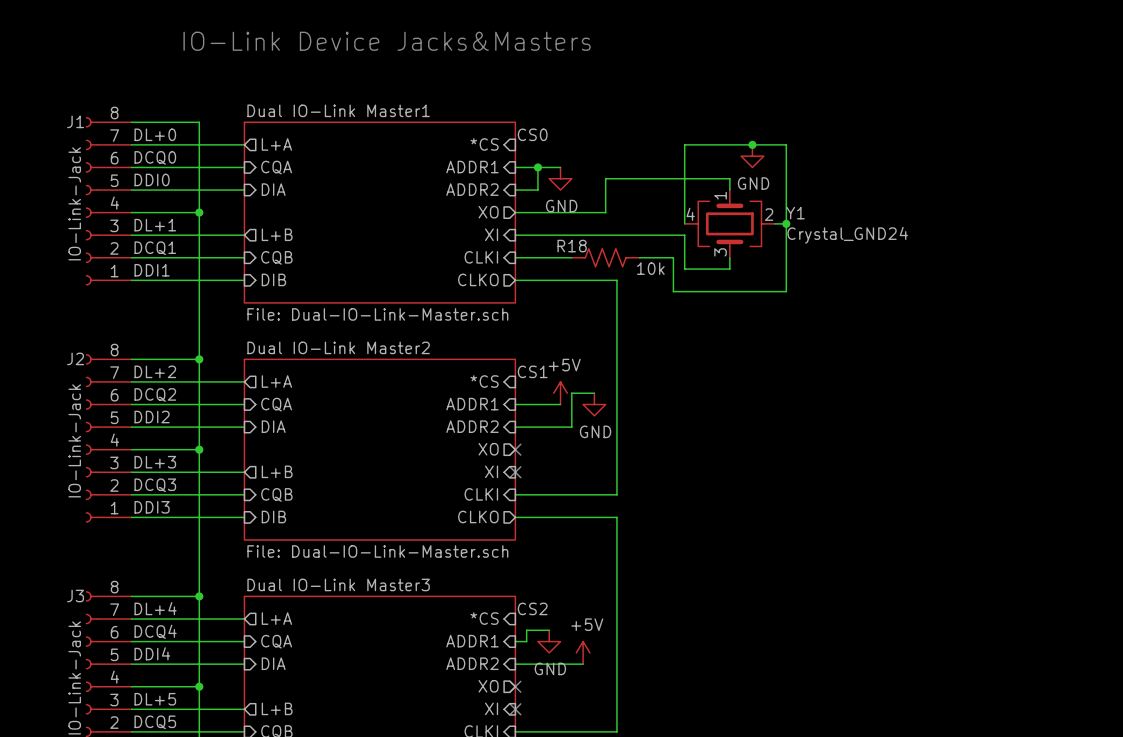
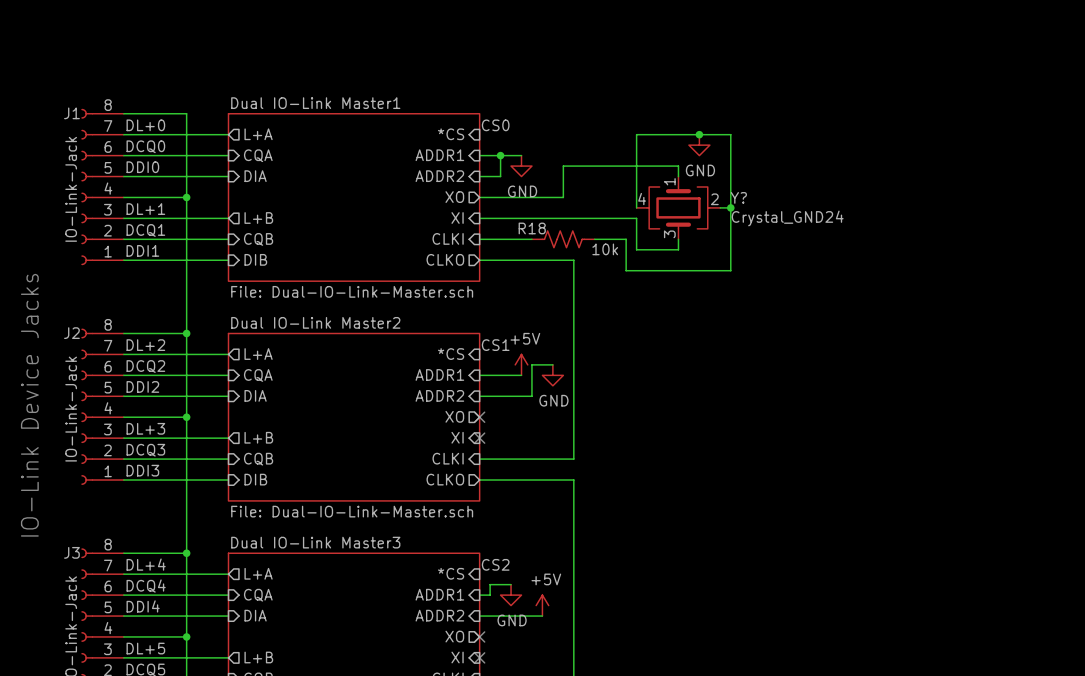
text: IO-Link Device Jacks&Masters (387, 41) -> none
Y1 name: Y1 (795, 213) -> Y? (738, 197)
text: none -> IO-Link Device Jacks (29, 405)

